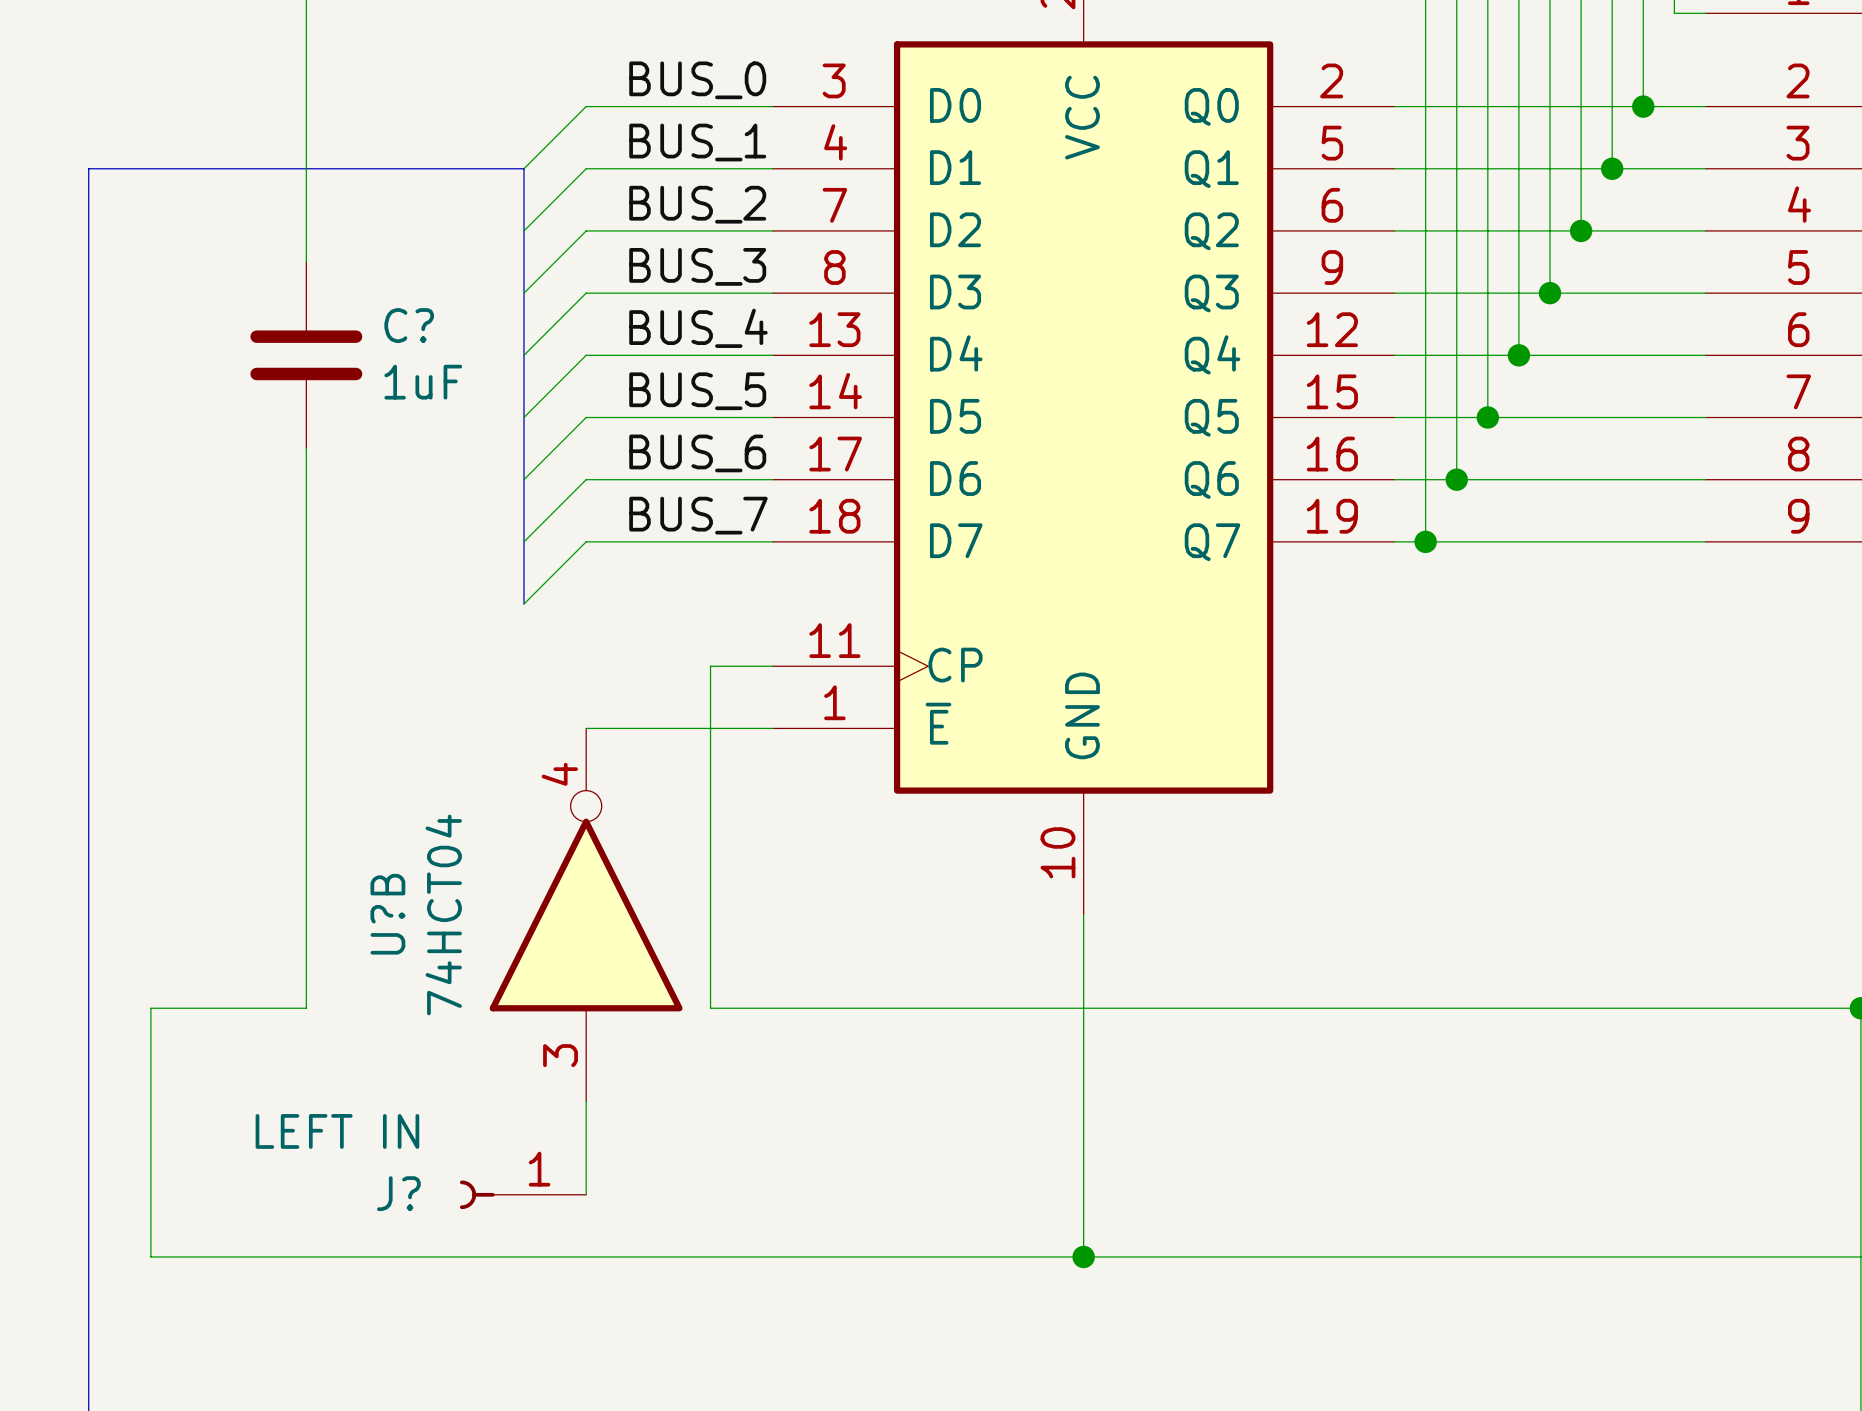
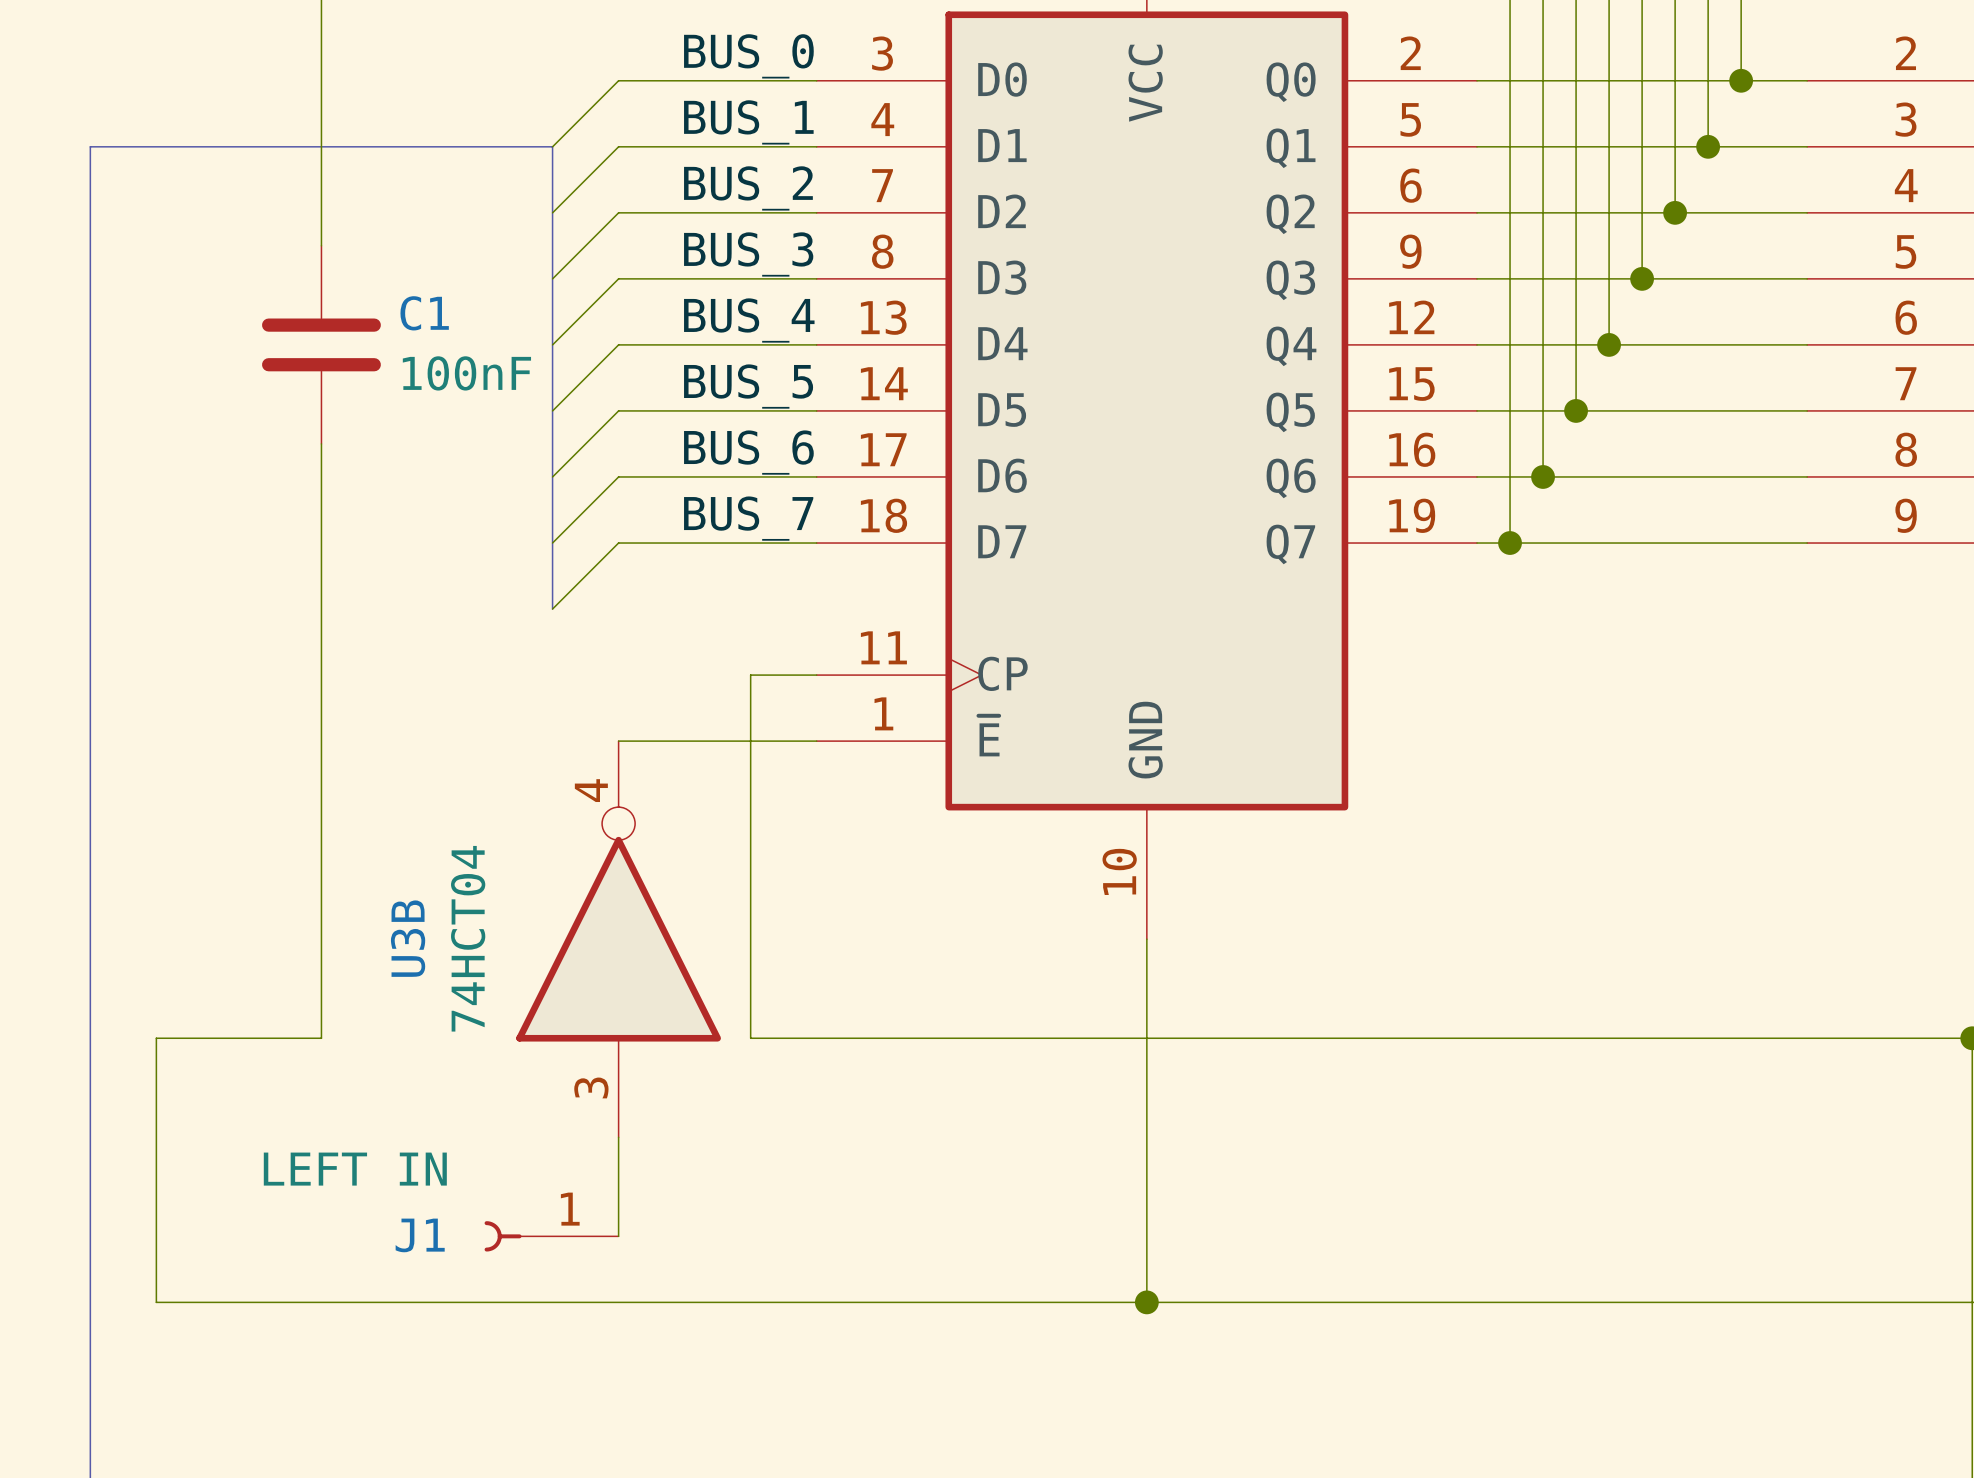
C? name: C? (409, 325) -> C1 (424, 313)
C? value: 1uF (423, 382) -> 100nF (466, 373)
U?B name: U?B (387, 914) -> U3B (408, 938)
J? name: J? (398, 1193) -> J1 (420, 1235)

